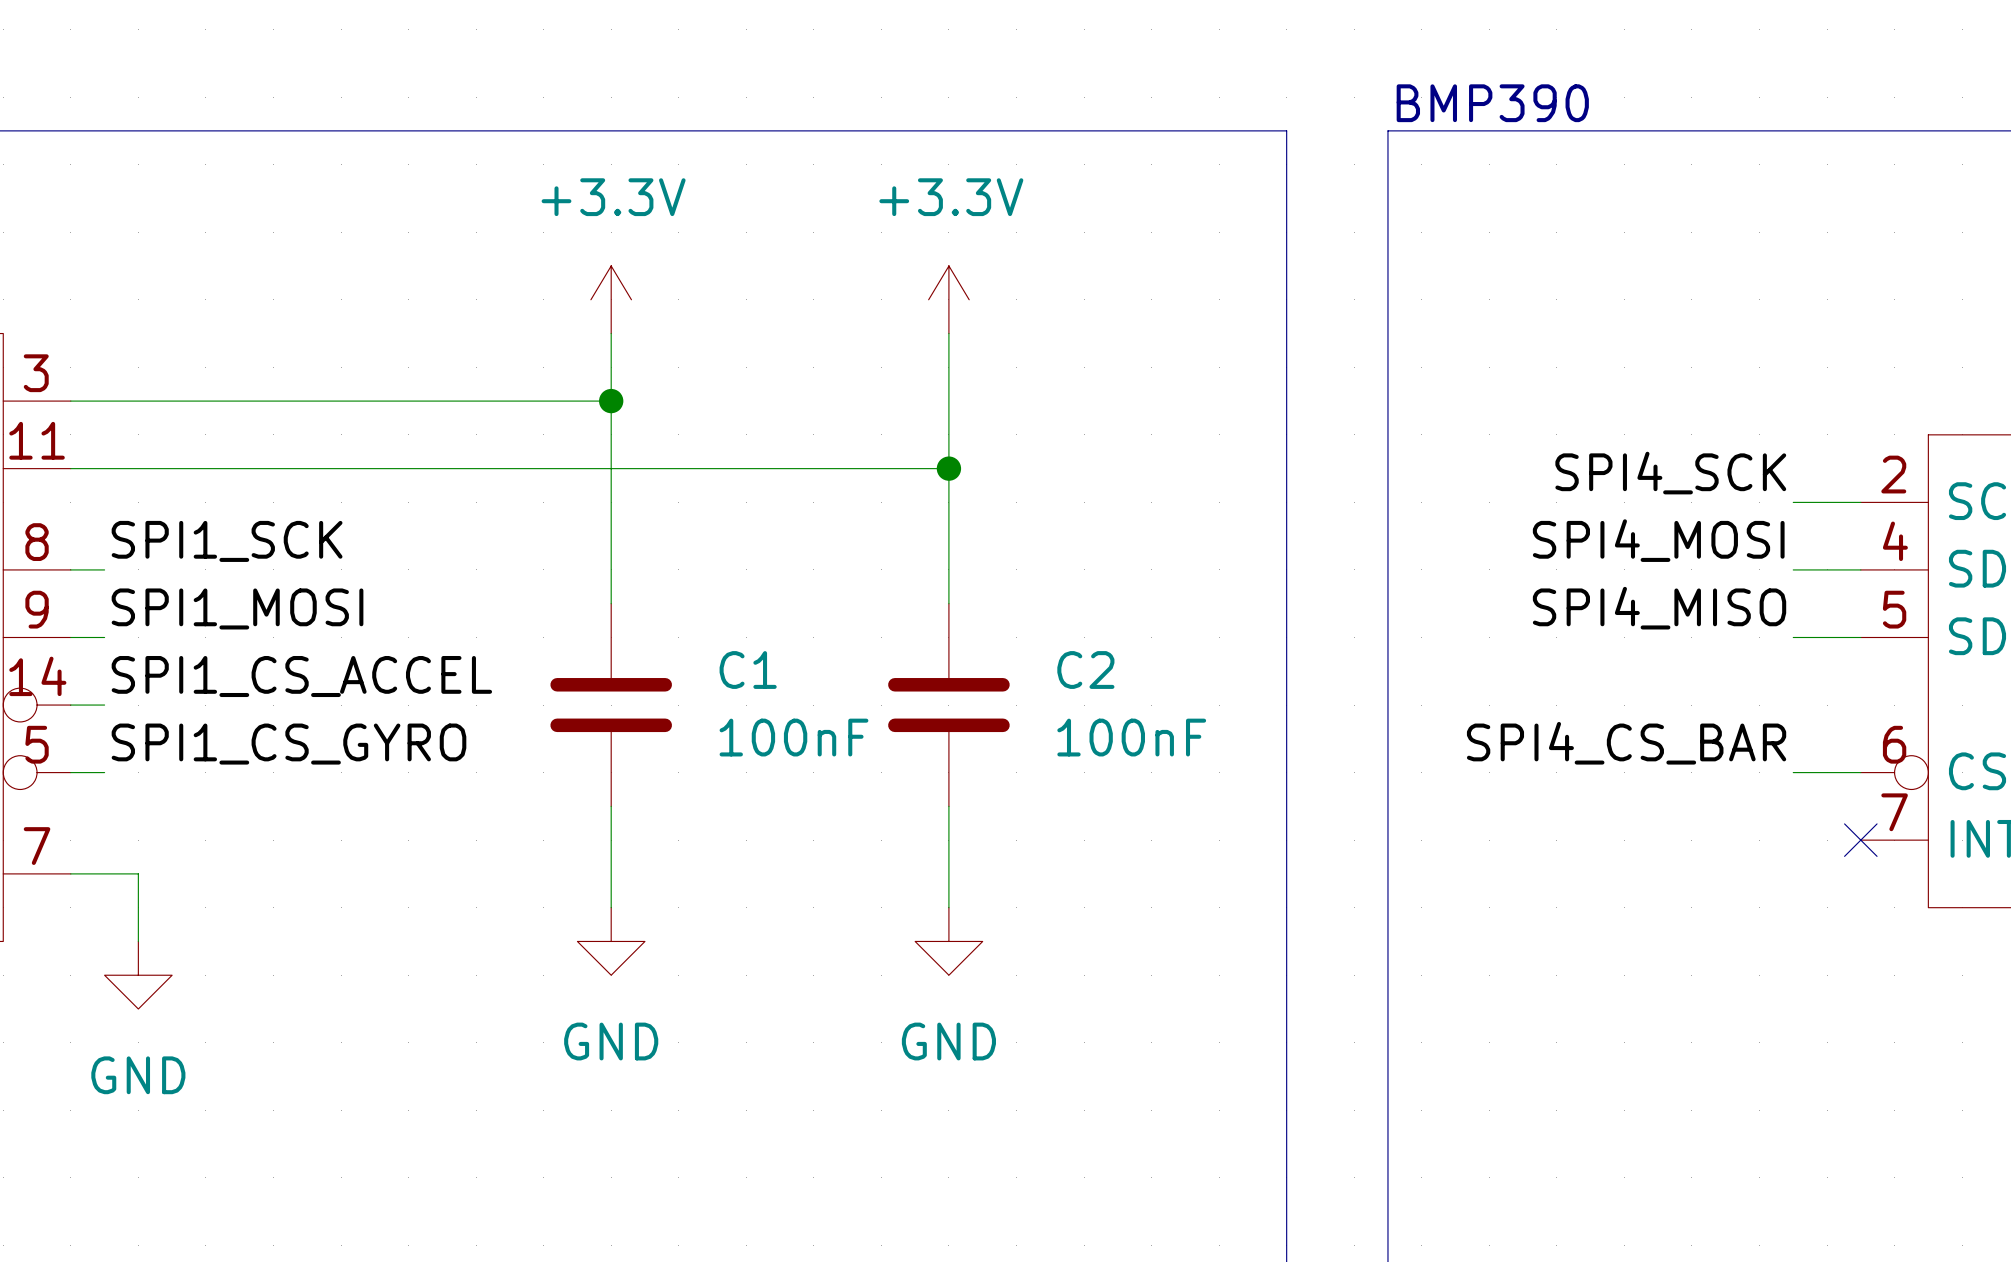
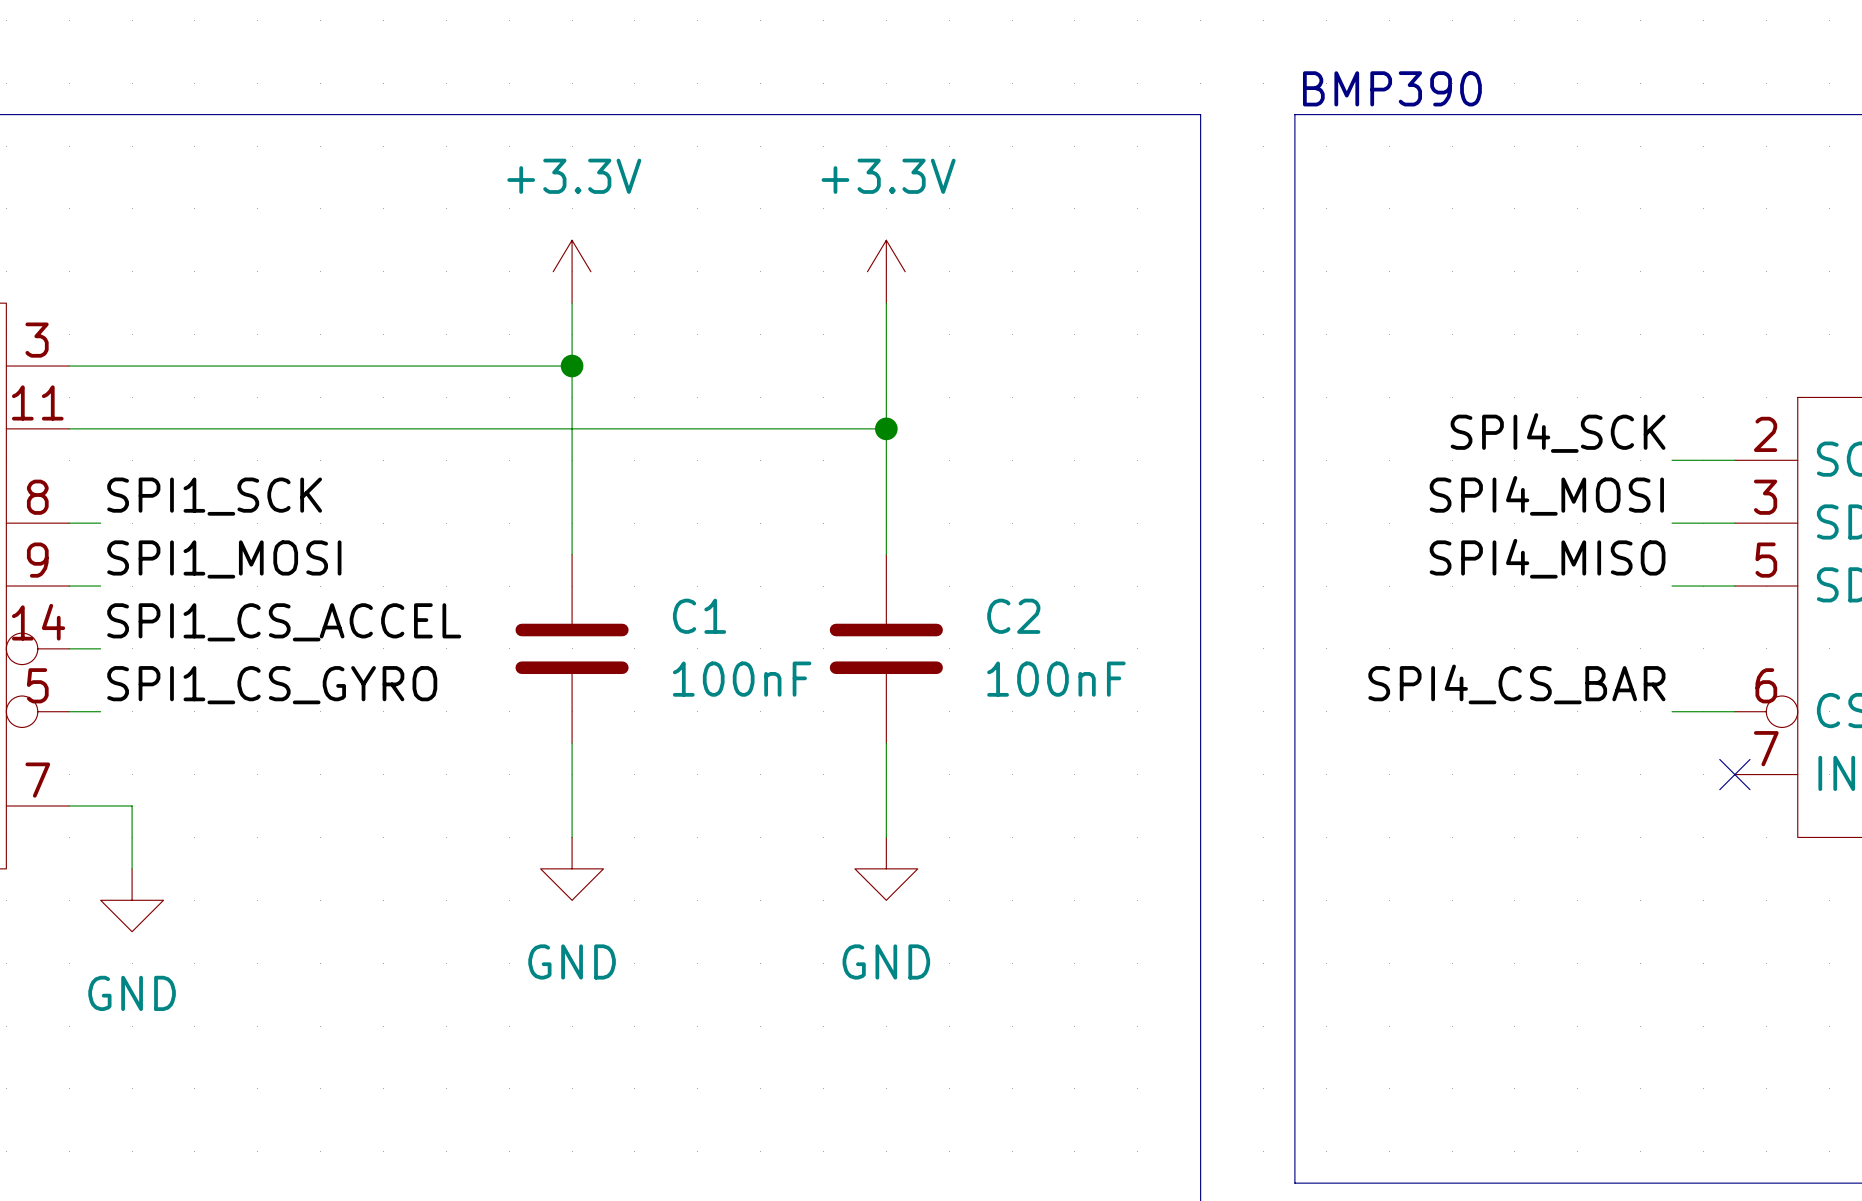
part pin number: 4 (1895, 541) -> 3 (1765, 497)

